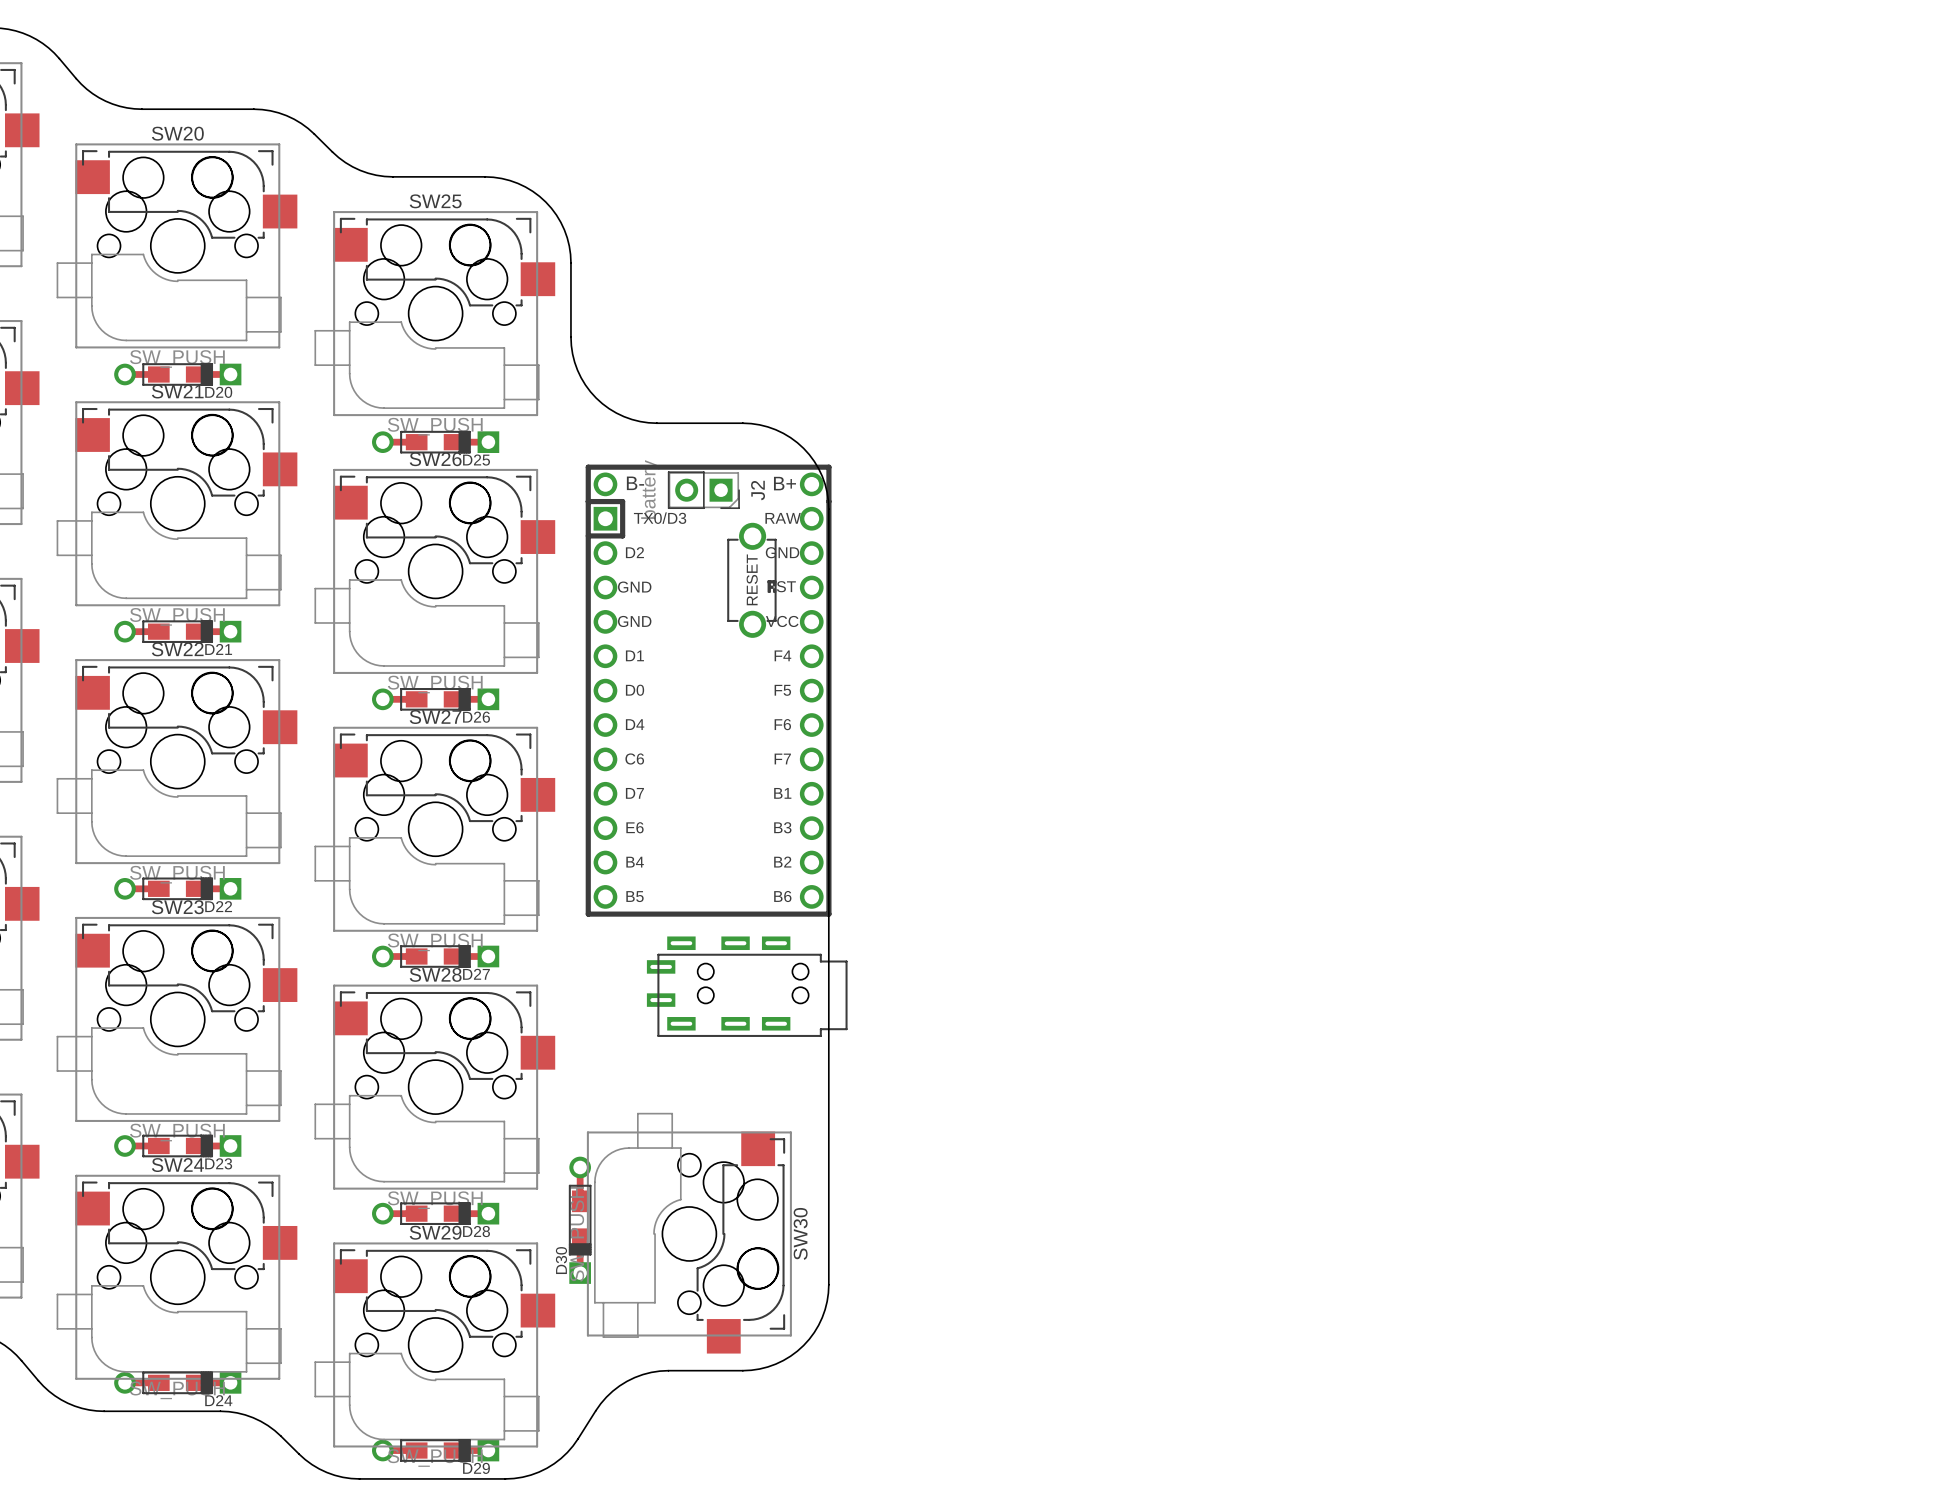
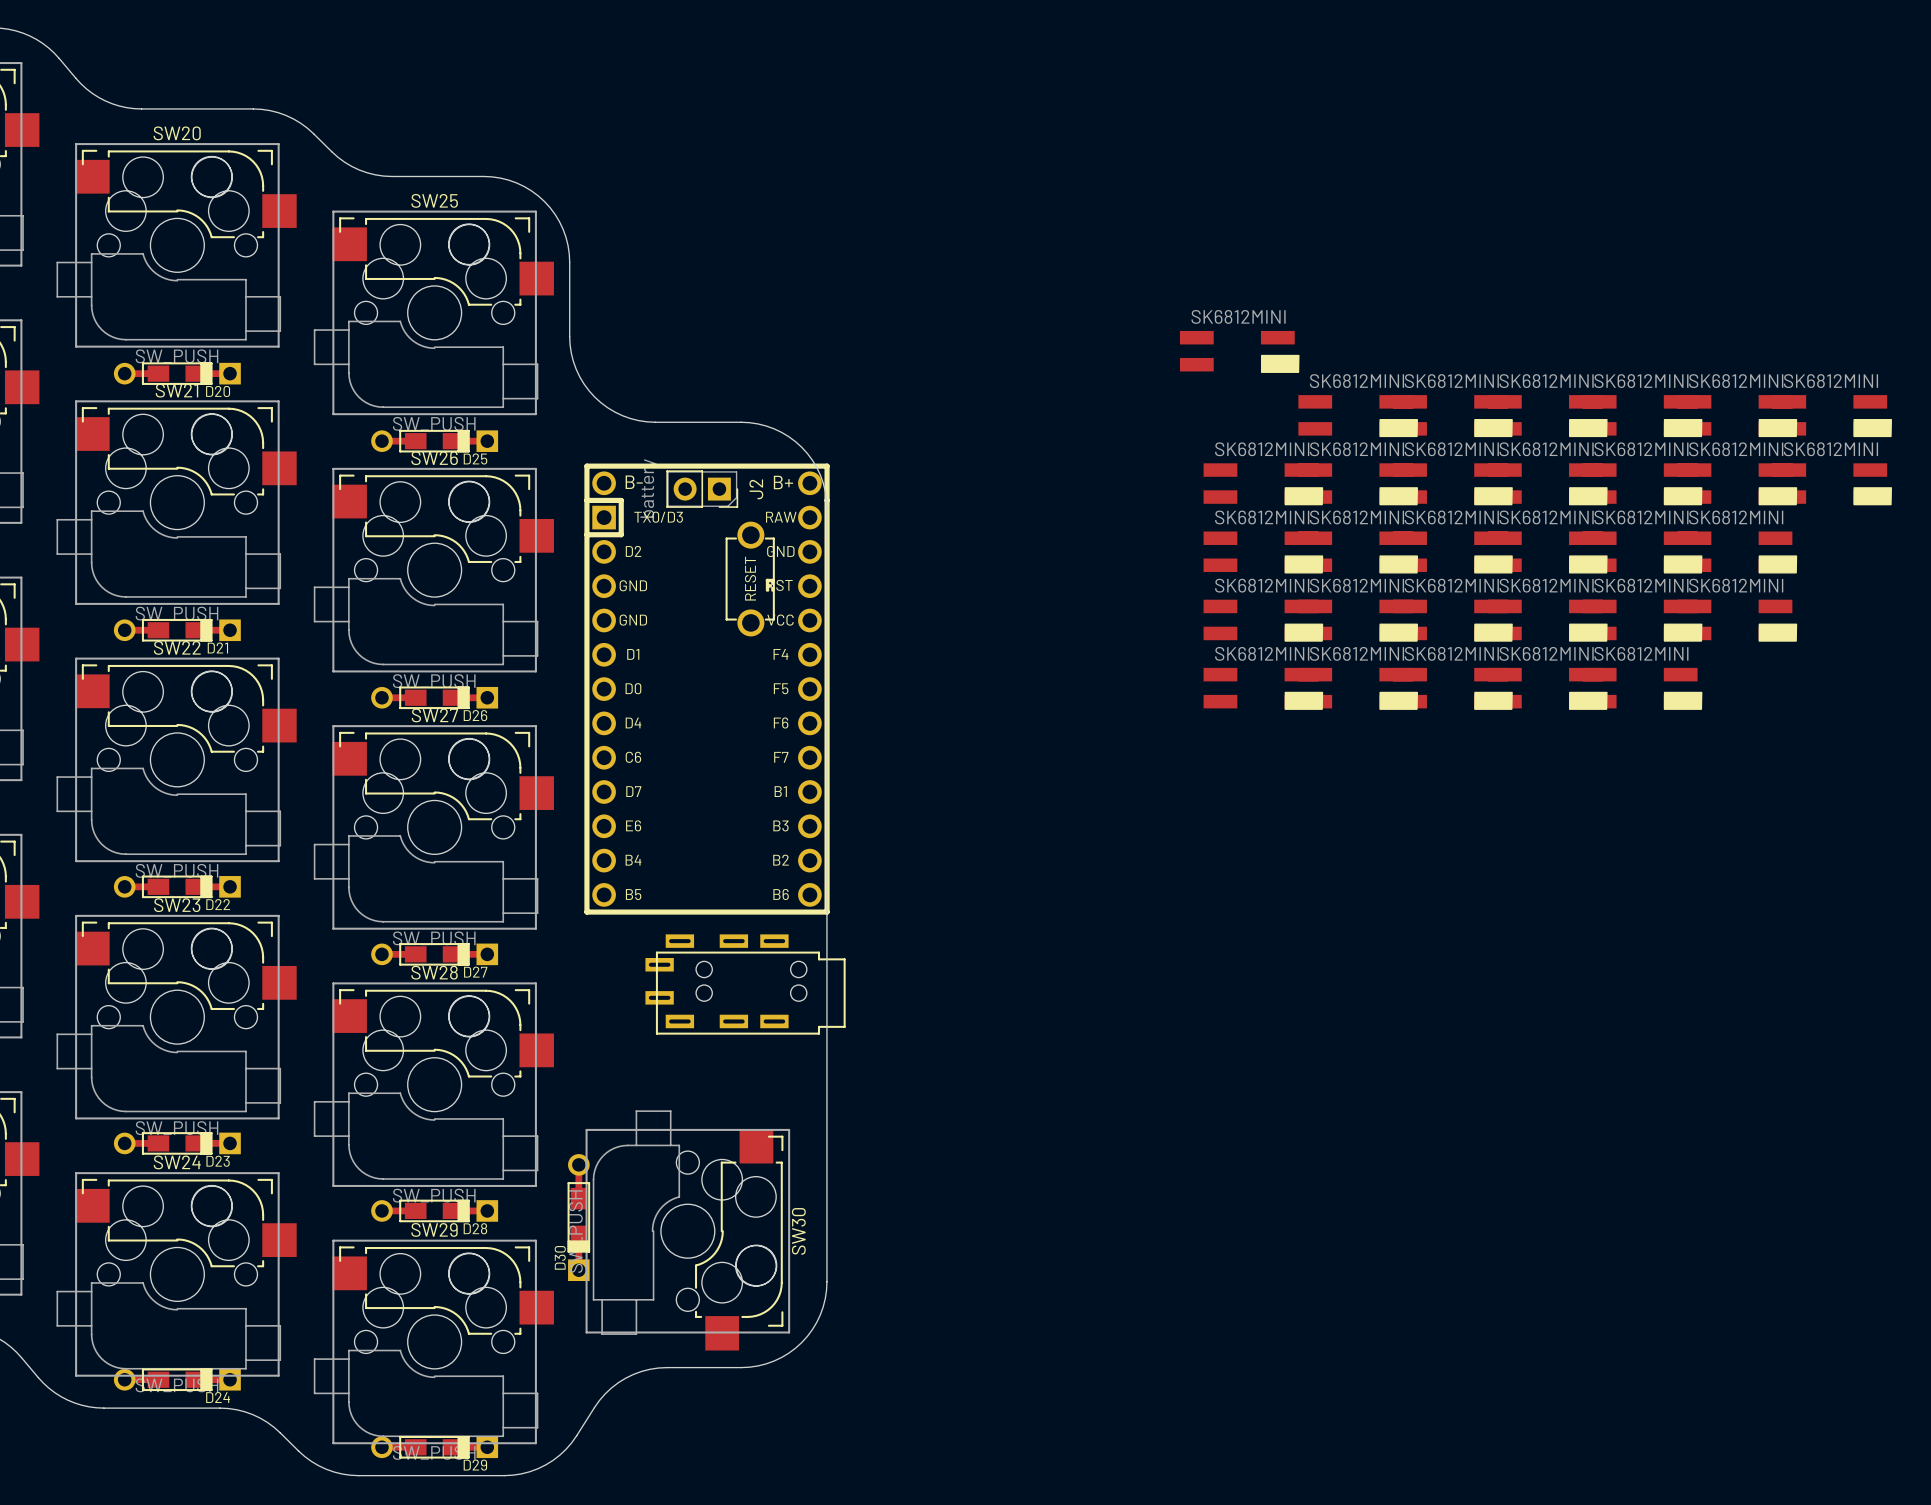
part: none -> SK6812MINI (1239, 351)
part: none -> SK6812MINI (1358, 416)
part: none -> SK6812MINI (1452, 416)
part: none -> SK6812MINI (1547, 416)
part: none -> SK6812MINI (1642, 416)
part: none -> SK6812MINI (1737, 416)
part: none -> SK6812MINI (1832, 416)
part: none -> SK6812MINI (1263, 484)
part: none -> SK6812MINI (1358, 484)
part: none -> SK6812MINI (1452, 484)
part: none -> SK6812MINI (1547, 484)
part: none -> SK6812MINI (1642, 484)
part: none -> SK6812MINI (1737, 484)
part: none -> SK6812MINI (1832, 484)
part: none -> SK6812MINI (1263, 552)
part: none -> SK6812MINI (1358, 552)
part: none -> SK6812MINI (1452, 552)
part: none -> SK6812MINI (1547, 552)
part: none -> SK6812MINI (1642, 552)
part: none -> SK6812MINI (1737, 552)
part: none -> SK6812MINI (1263, 620)
part: none -> SK6812MINI (1358, 620)
part: none -> SK6812MINI (1452, 620)
part: none -> SK6812MINI (1547, 620)
part: none -> SK6812MINI (1642, 620)
part: none -> SK6812MINI (1737, 620)
part: none -> SK6812MINI (1263, 688)
part: none -> SK6812MINI (1358, 688)
part: none -> SK6812MINI (1452, 688)
part: none -> SK6812MINI (1547, 688)
part: none -> SK6812MINI (1642, 688)

